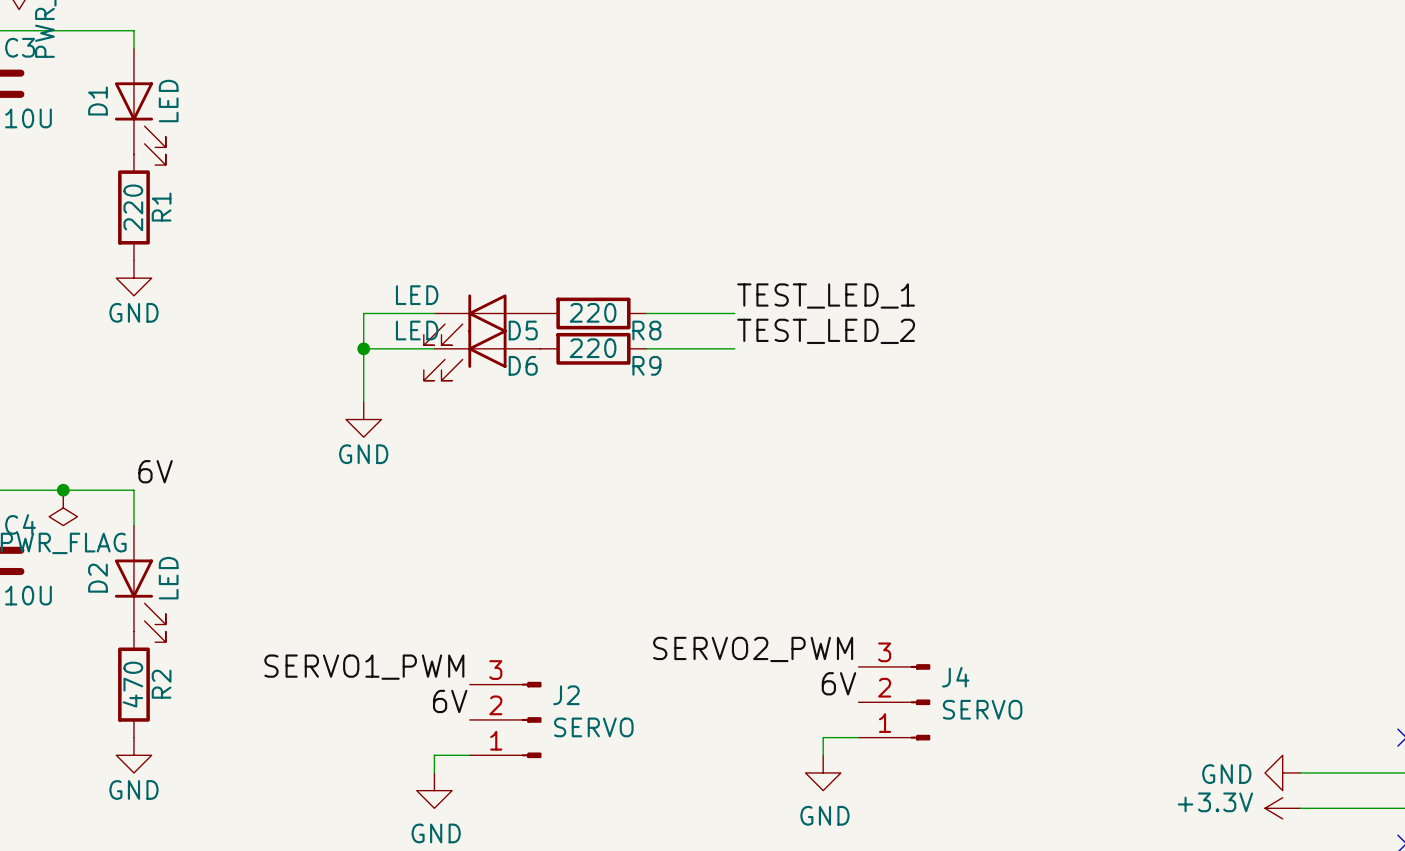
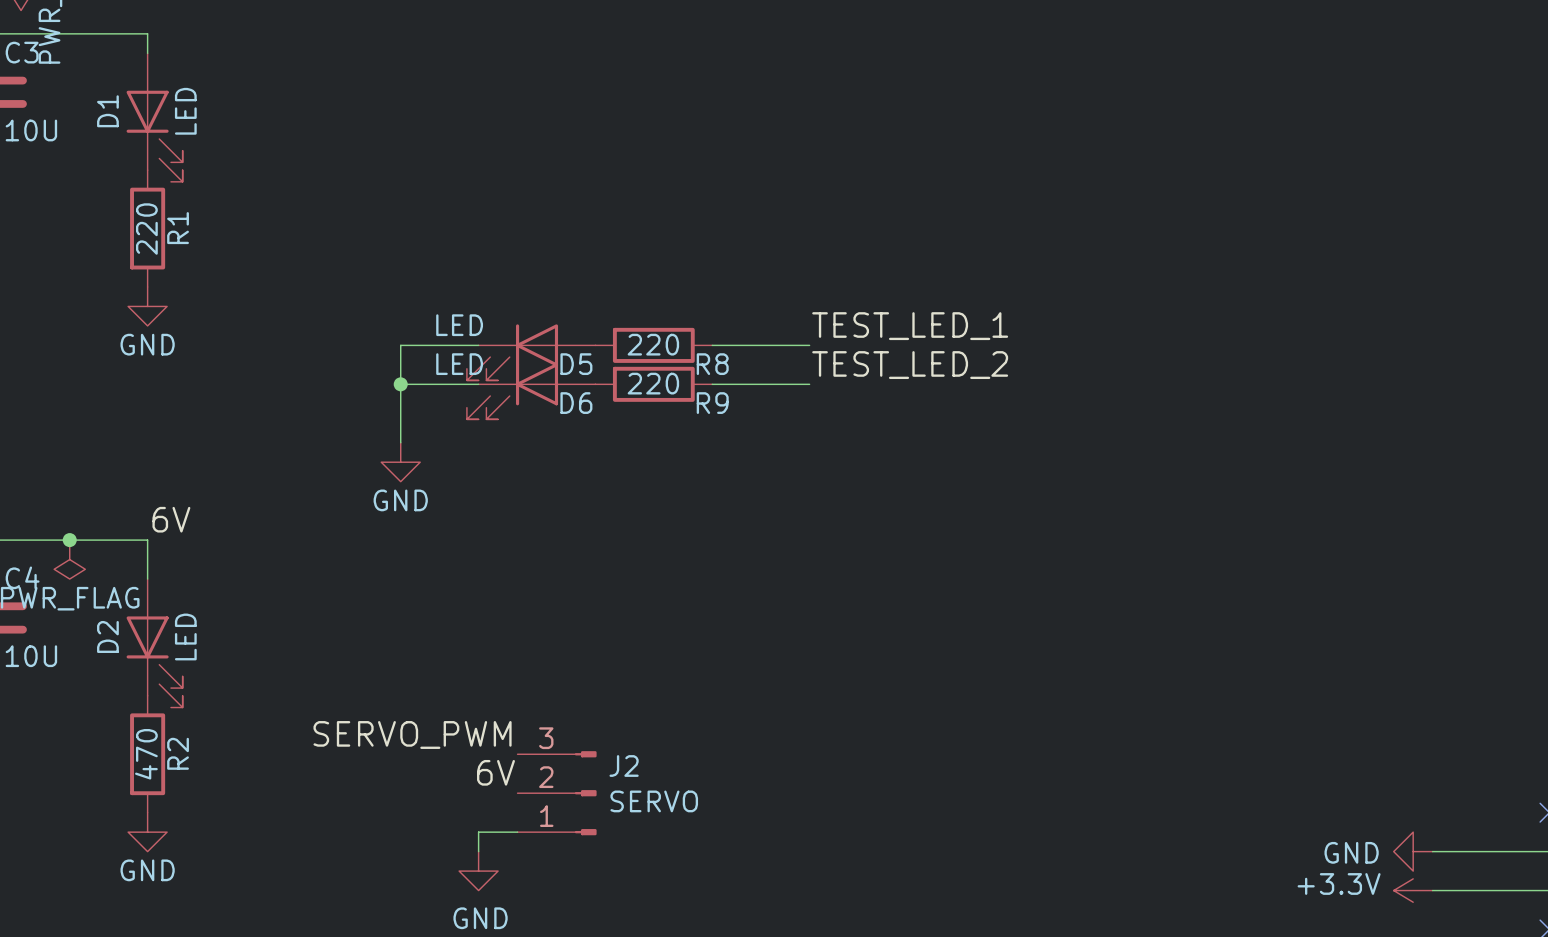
label: SERVO2_PWM (753, 649) -> none
label: SERVO1_PWM (364, 667) -> SERVO_PWM (412, 734)
label: 6V (838, 683) -> none
J4: SERVO (894, 702) -> none
wire: (858, 737) (823, 737) (823, 755) -> none
power symbol: GND (823, 772) -> none

